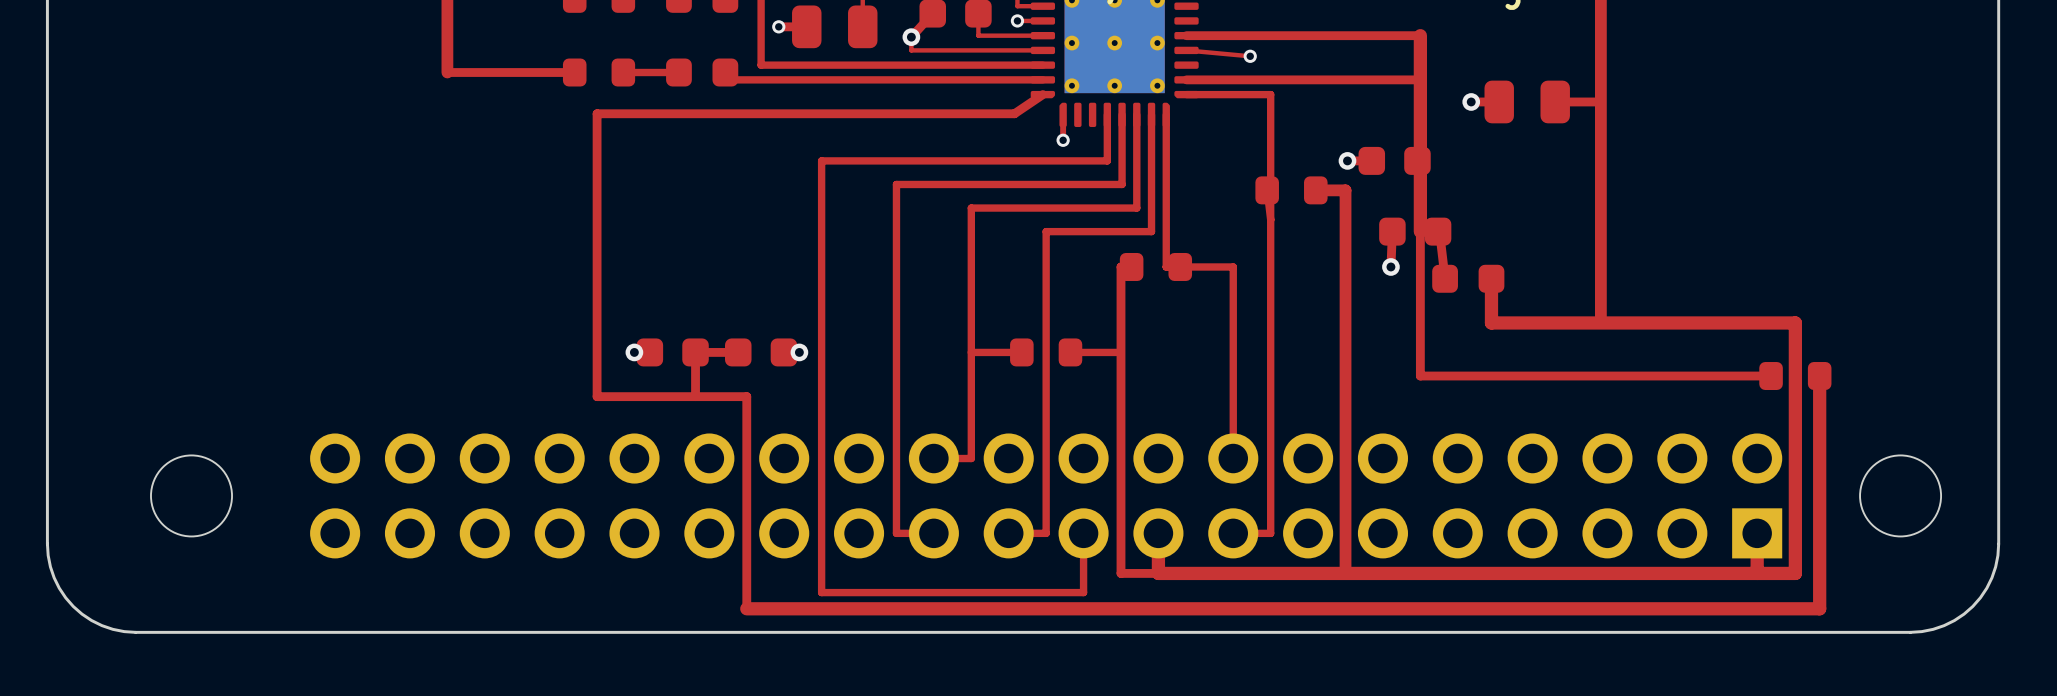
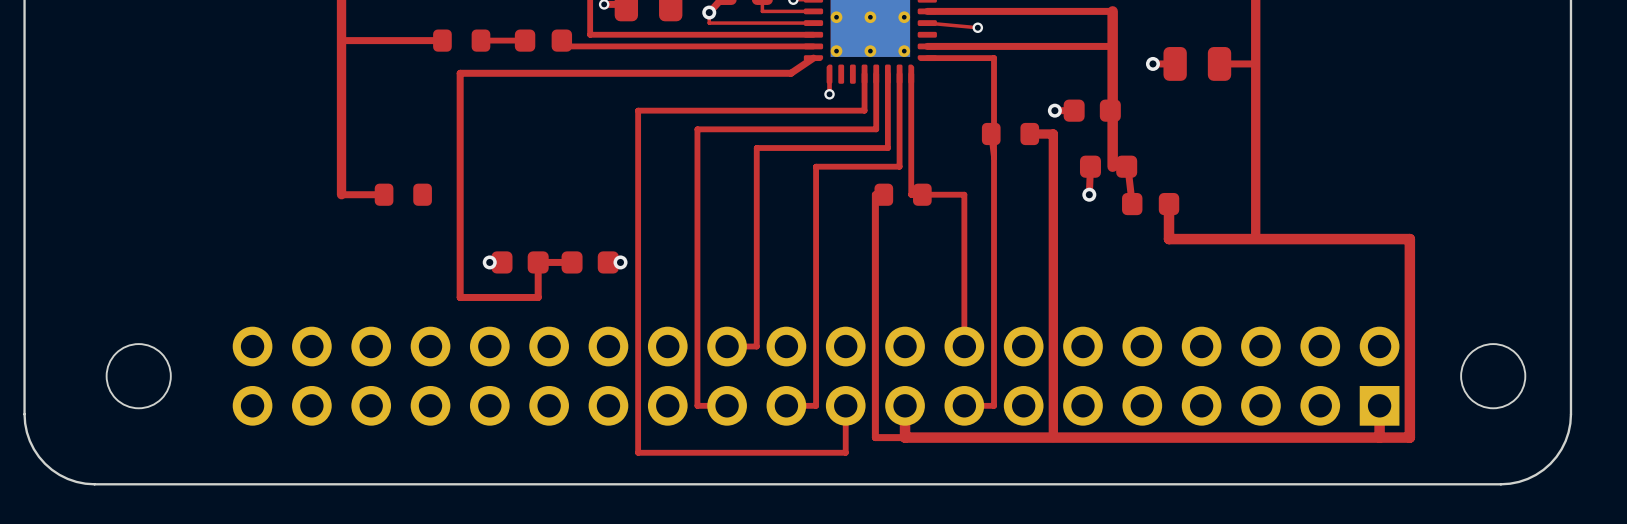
top track: none -> (341, 40) (341, 194) (384, 194)
top track: (1420, 231) (1420, 376) (1771, 376) -> none
top track: (1021, 352) (971, 352) -> none
part position: (1046, 352) -> (403, 194)
top track: (1121, 352) (1070, 352) -> none
part: (1795, 376) -> none
top track: (1819, 376) (1819, 608) (746, 608) (746, 396) (695, 396) -> none

